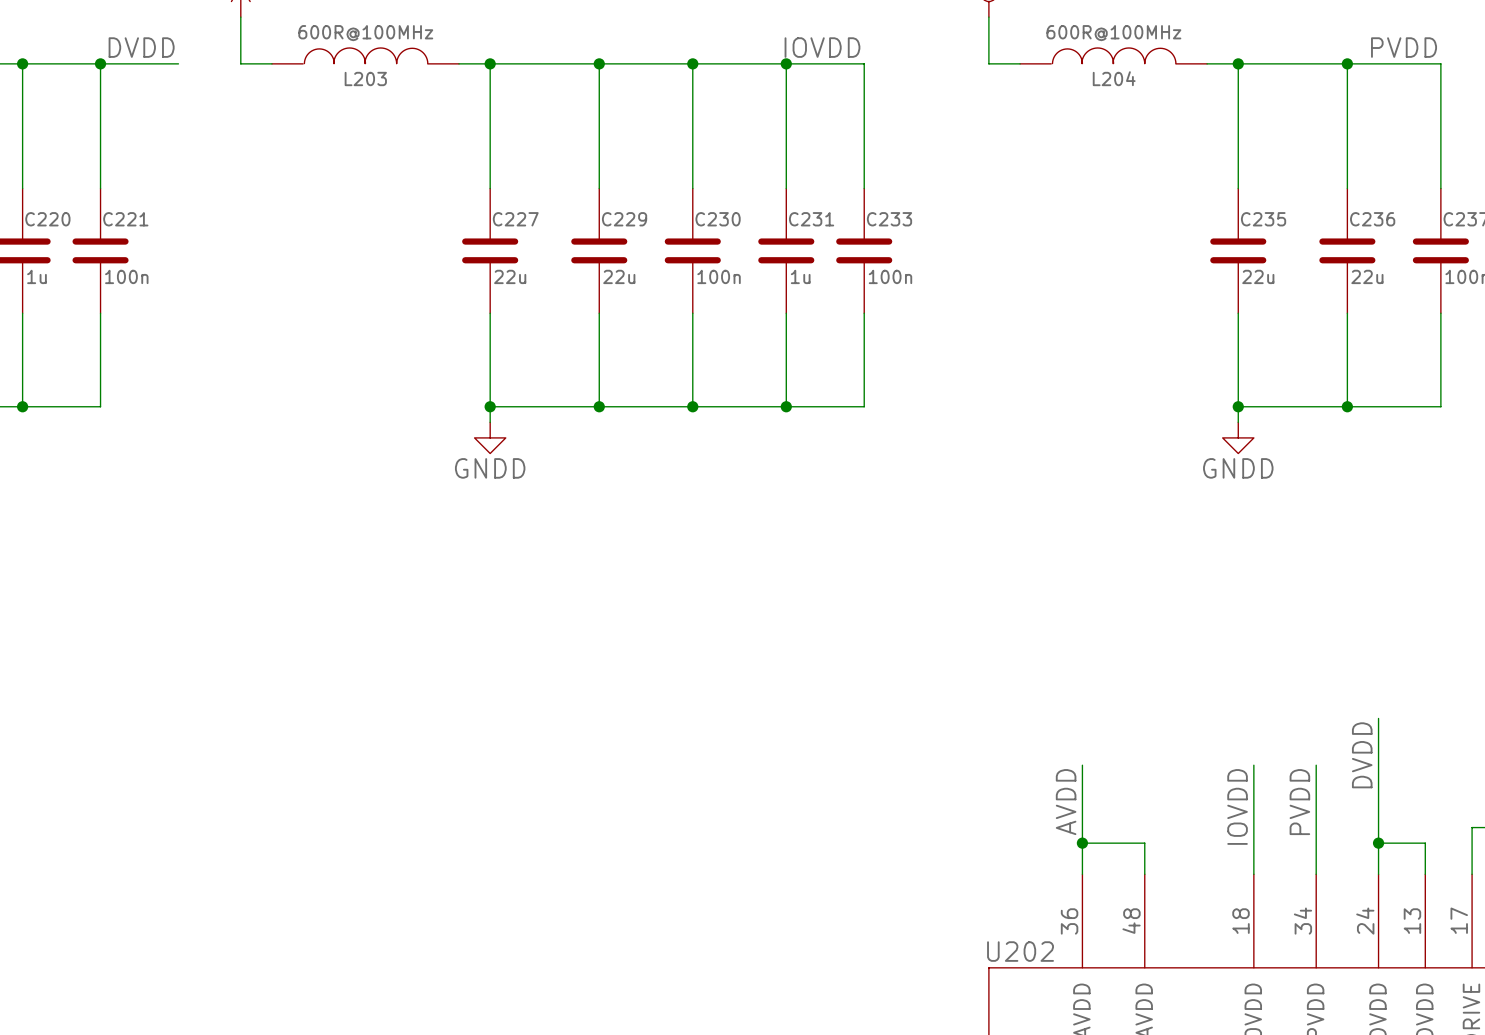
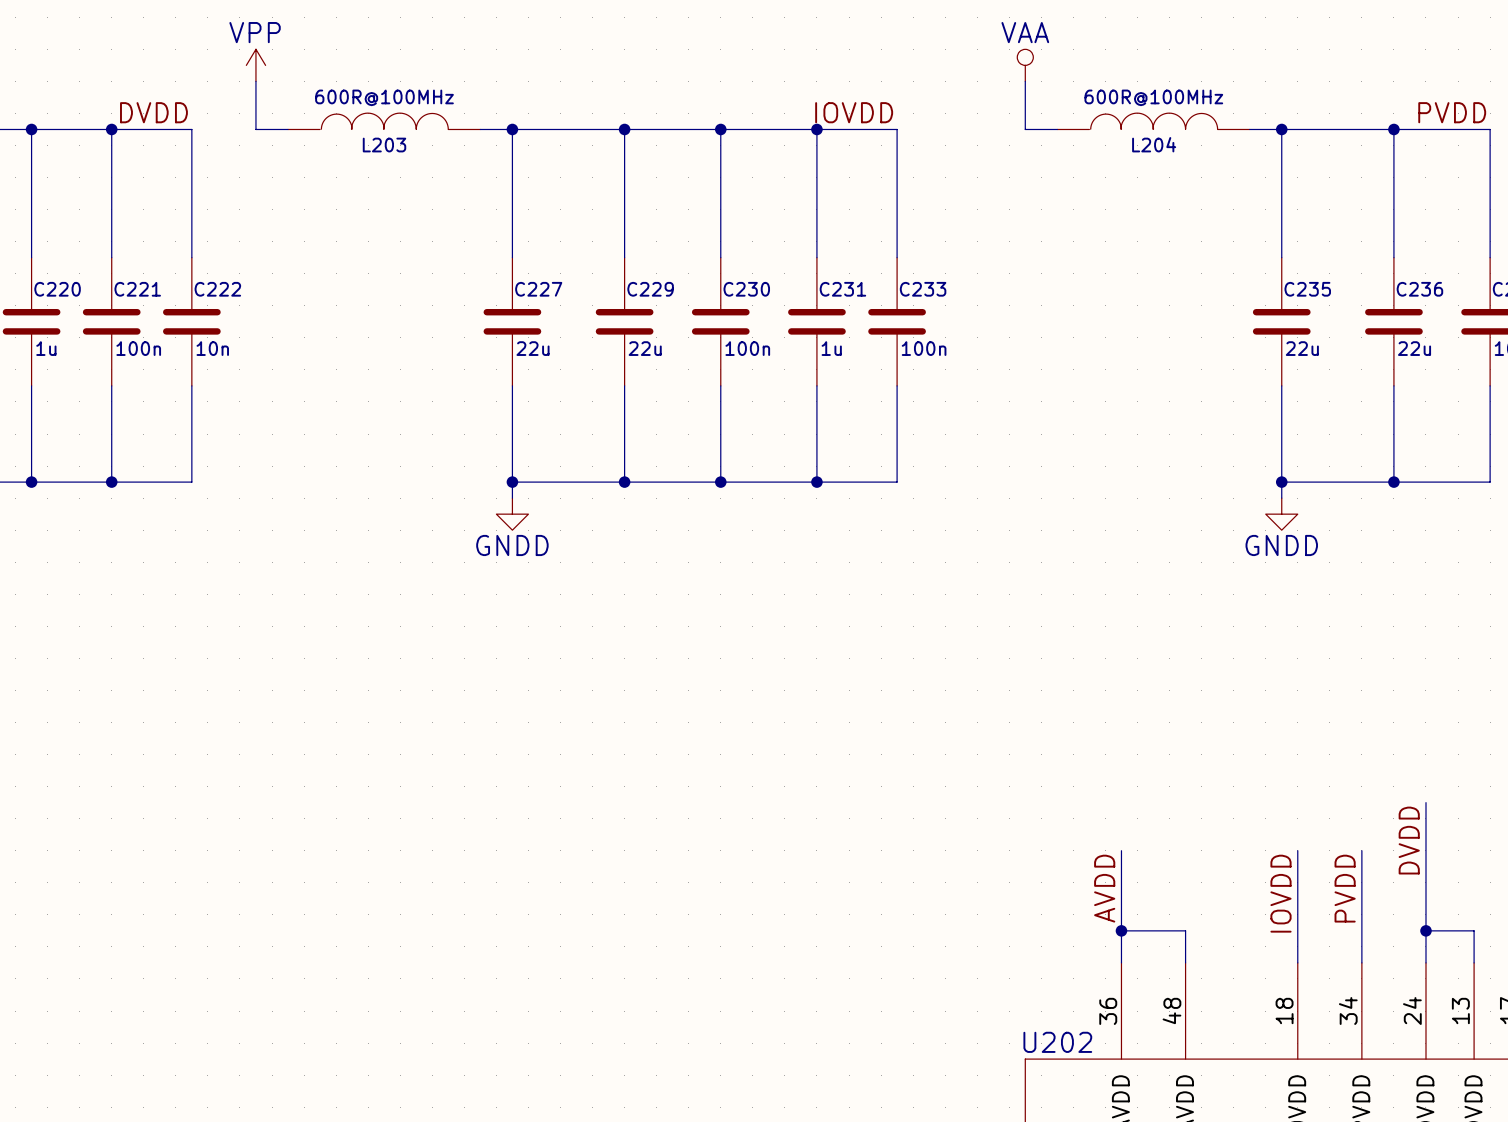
wire: none -> (191, 129) (191, 257)
C222: none -> 10n (191, 321)
wire: none -> (191, 385) (191, 482) (111, 482)
junction: none -> (111, 482)

